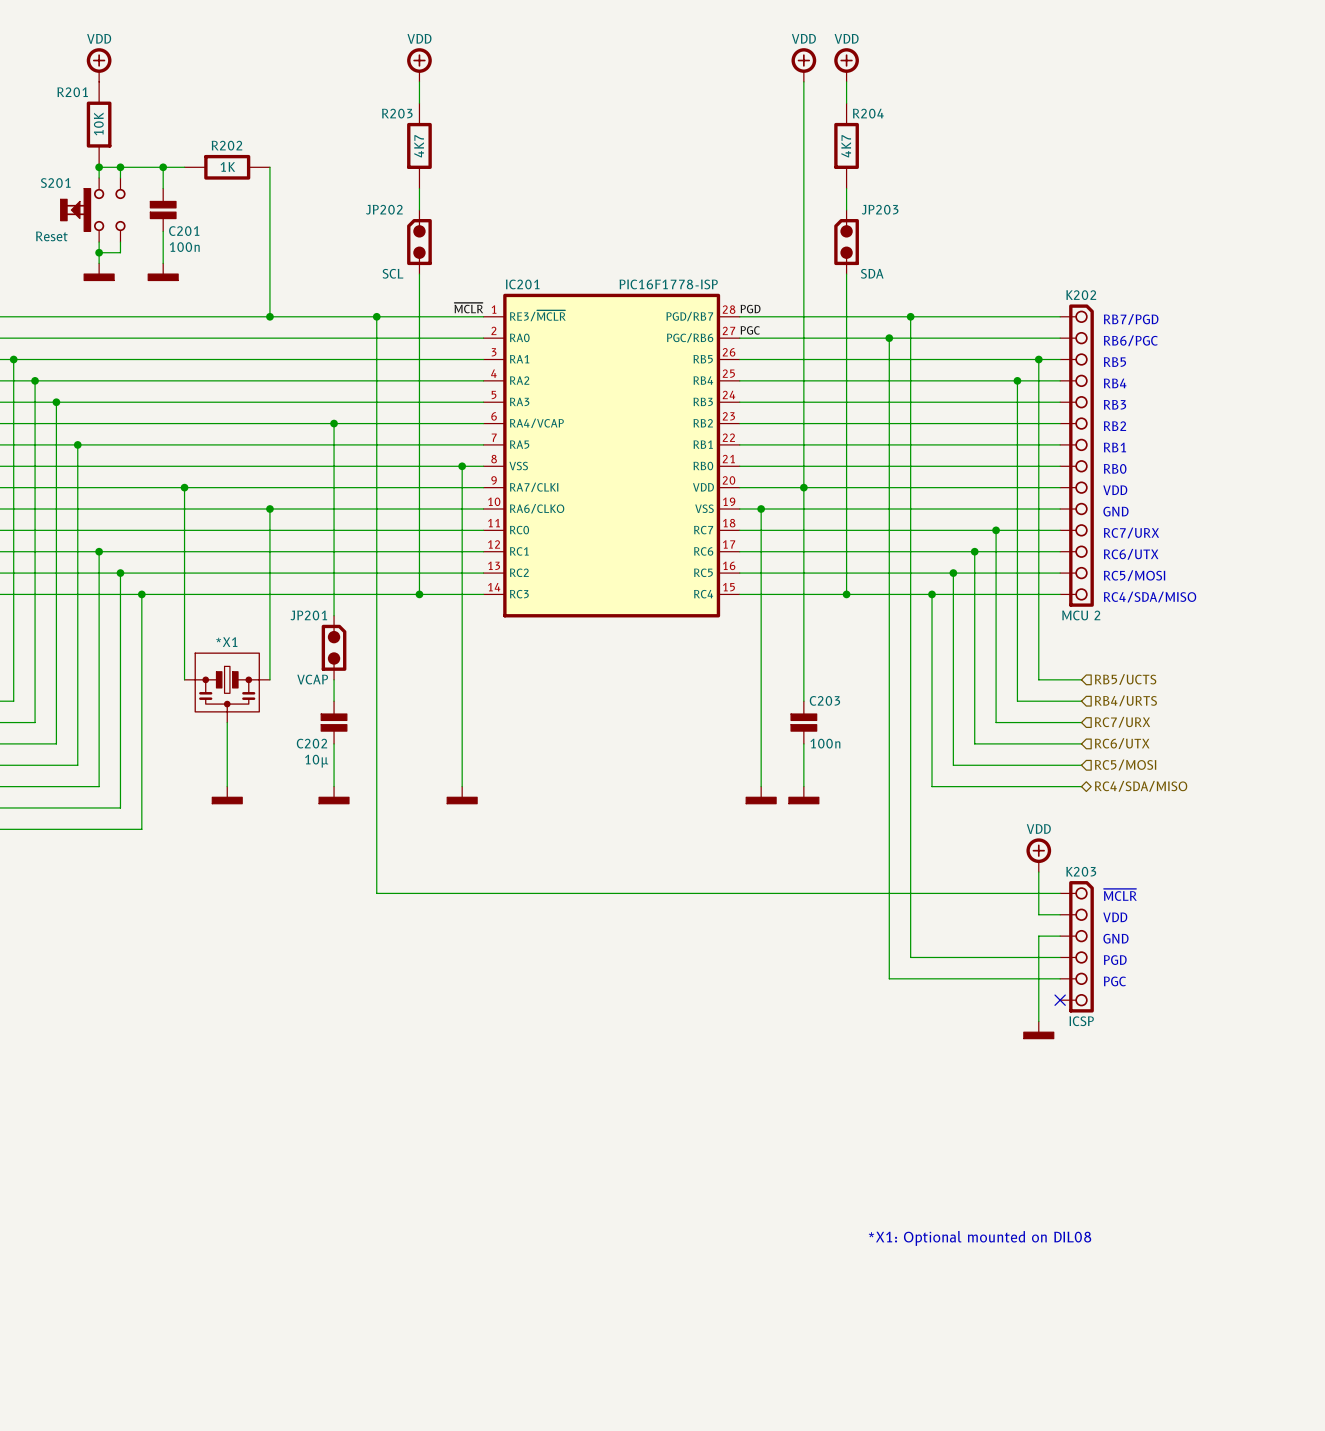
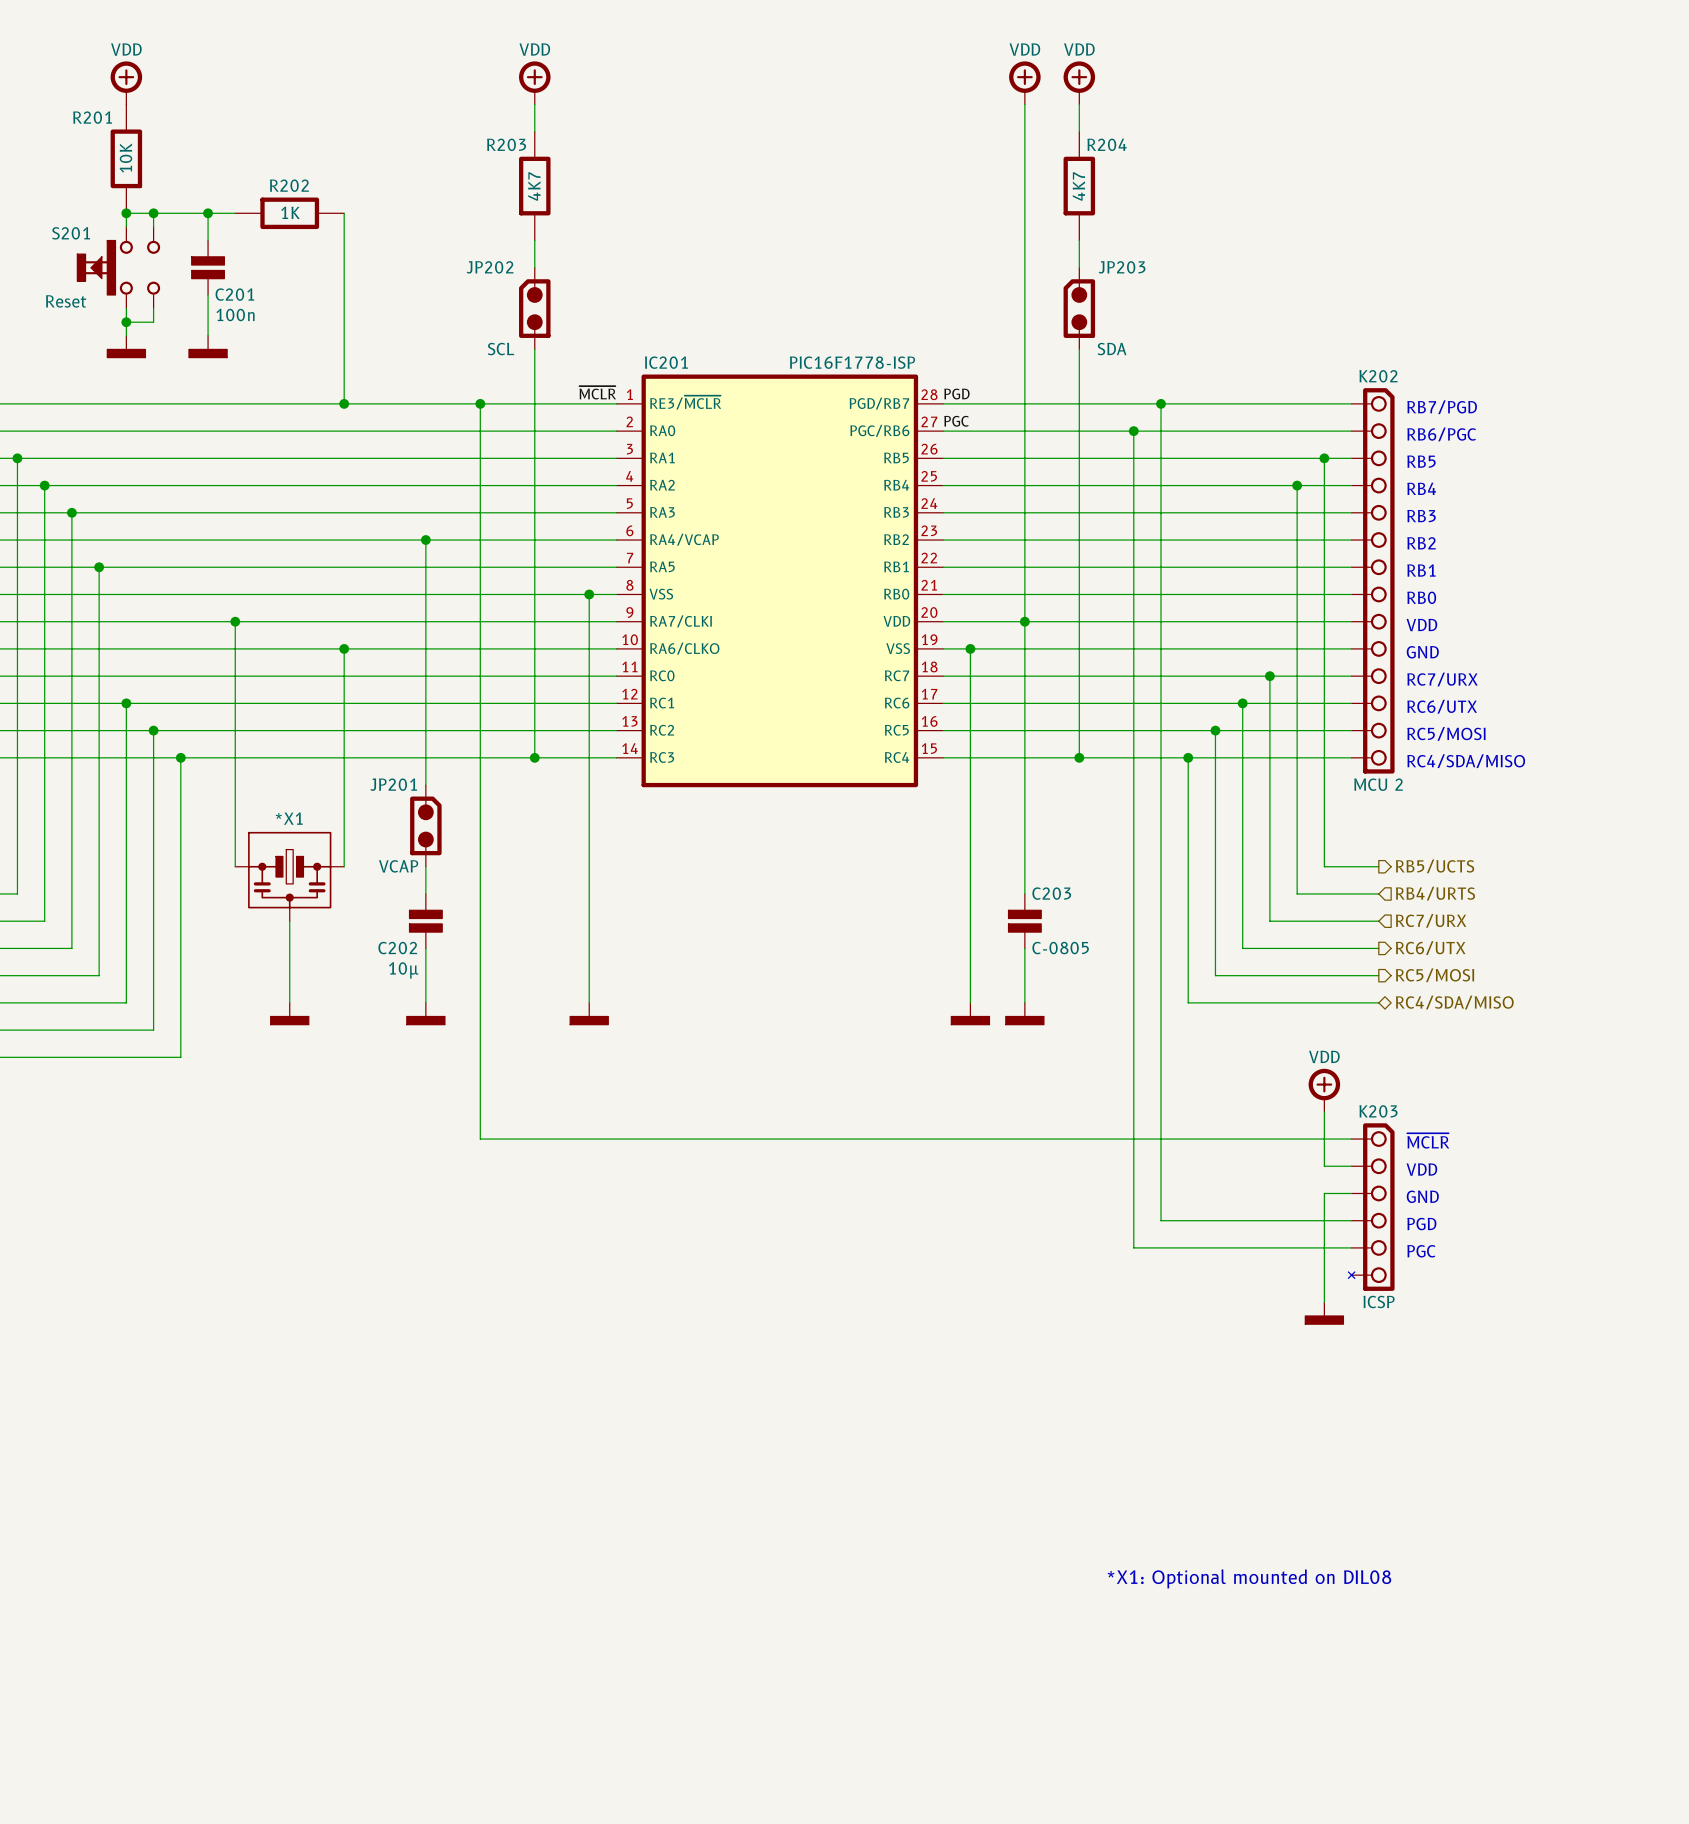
hierarchical label shape: input (1125, 679) -> output (1435, 866)
C203 value: 100n (825, 743) -> C-0805 (1060, 948)
hierarchical label shape: input (1122, 743) -> output (1430, 948)
hierarchical label shape: input (1125, 764) -> output (1435, 975)
K203 symbol: [1060, 881, 1094, 1013] -> [1348, 1123, 1395, 1291]
no-connect mark: (1060, 1000) -> none

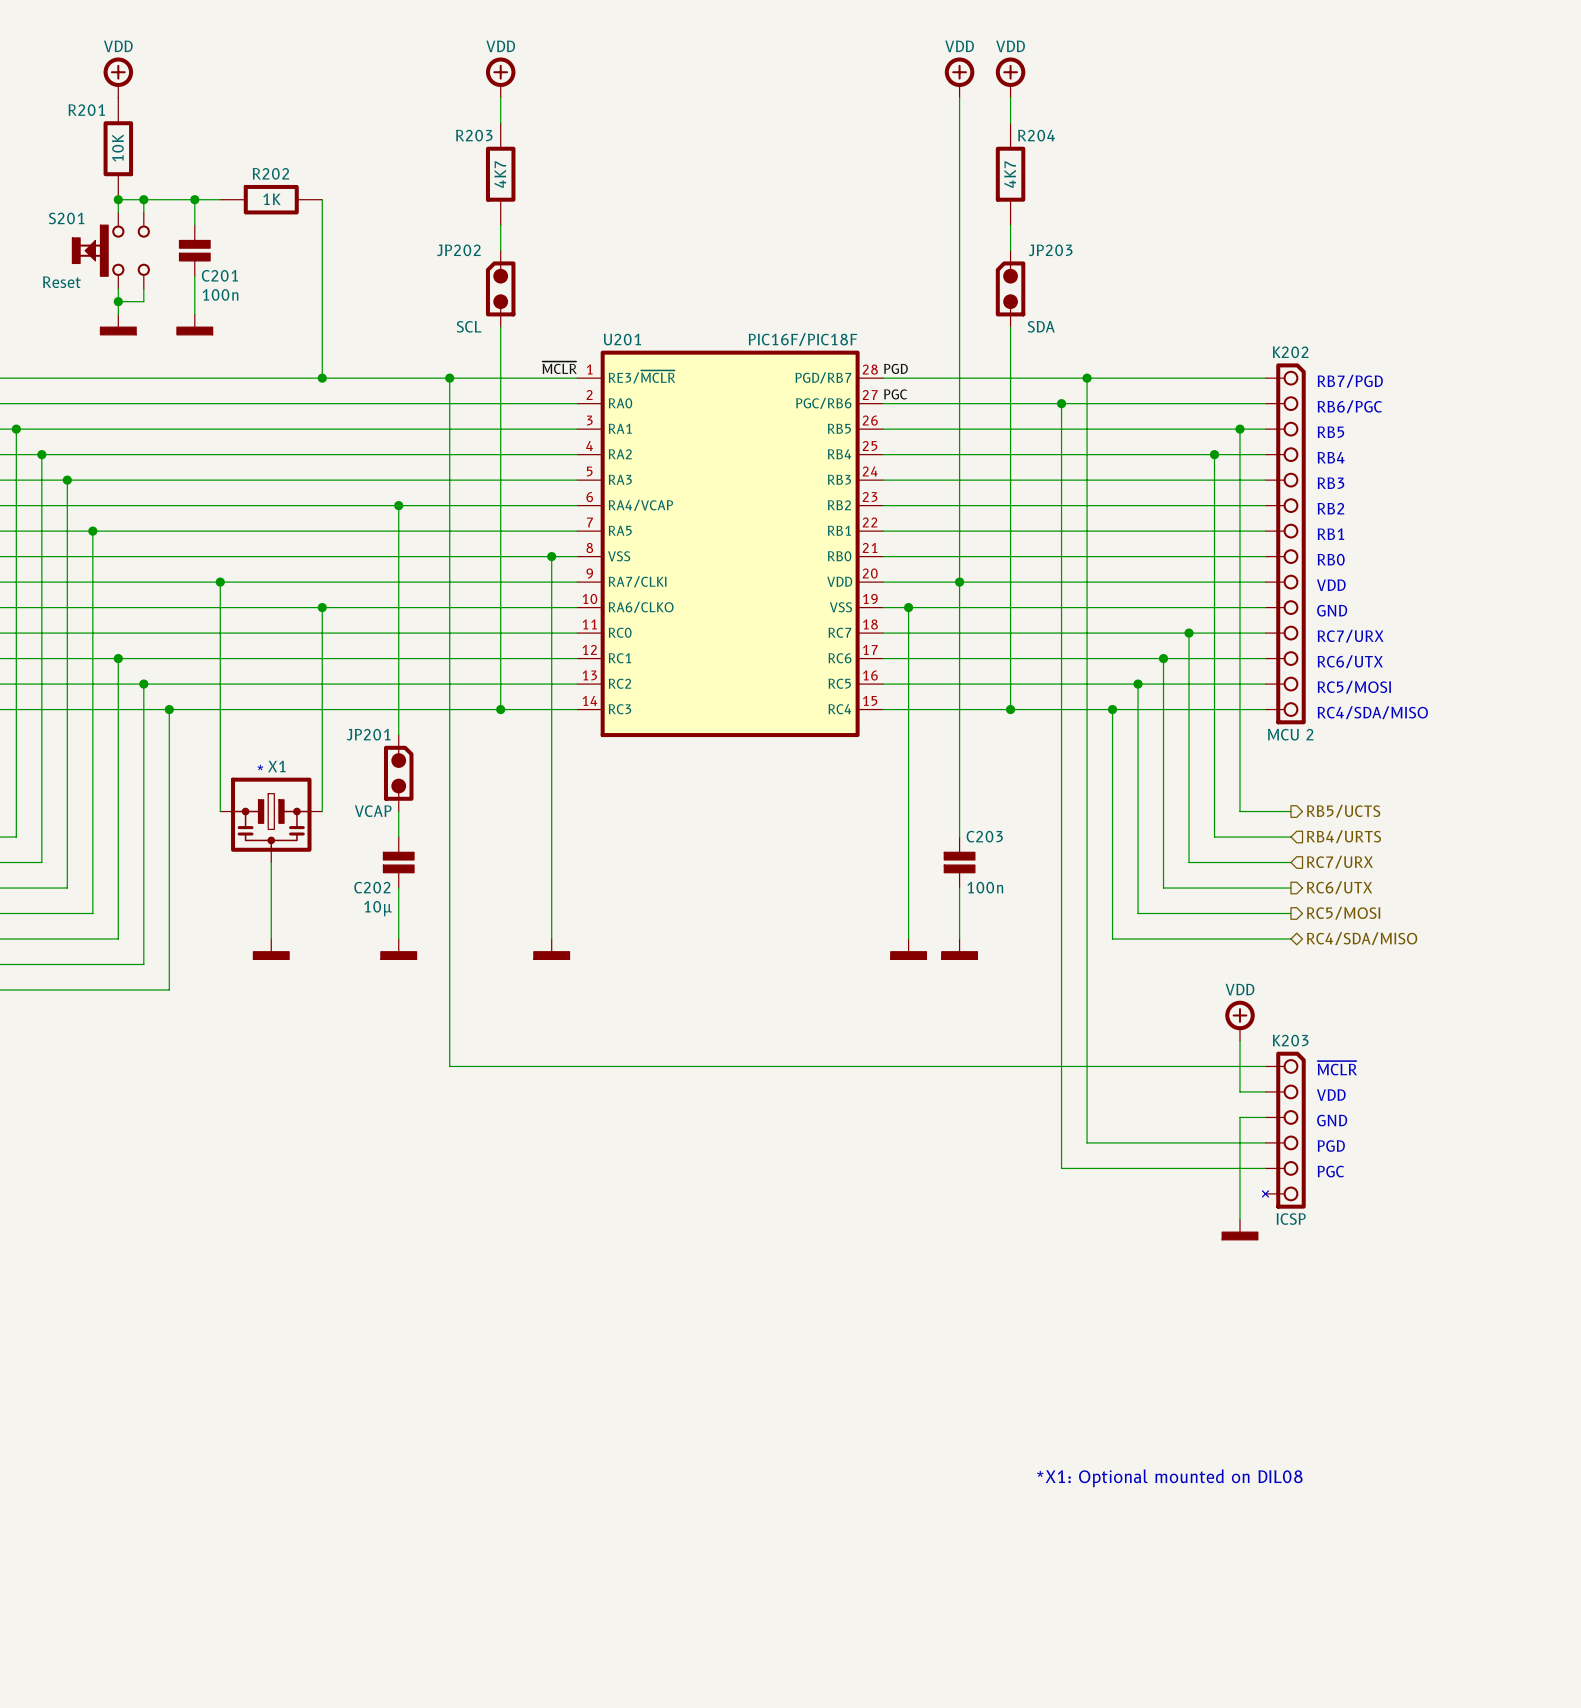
IC201 name: IC201 (666, 362) -> U201 (622, 339)
IC201 text: PIC16F1778-ISP (852, 362) -> PIC16F/PIC18F (802, 339)
text: none -> * (260, 767)
X1: none -> (271, 820)
*X1: (289, 876) -> none
C203 value: C-0805 (1060, 948) -> 100n (985, 887)

